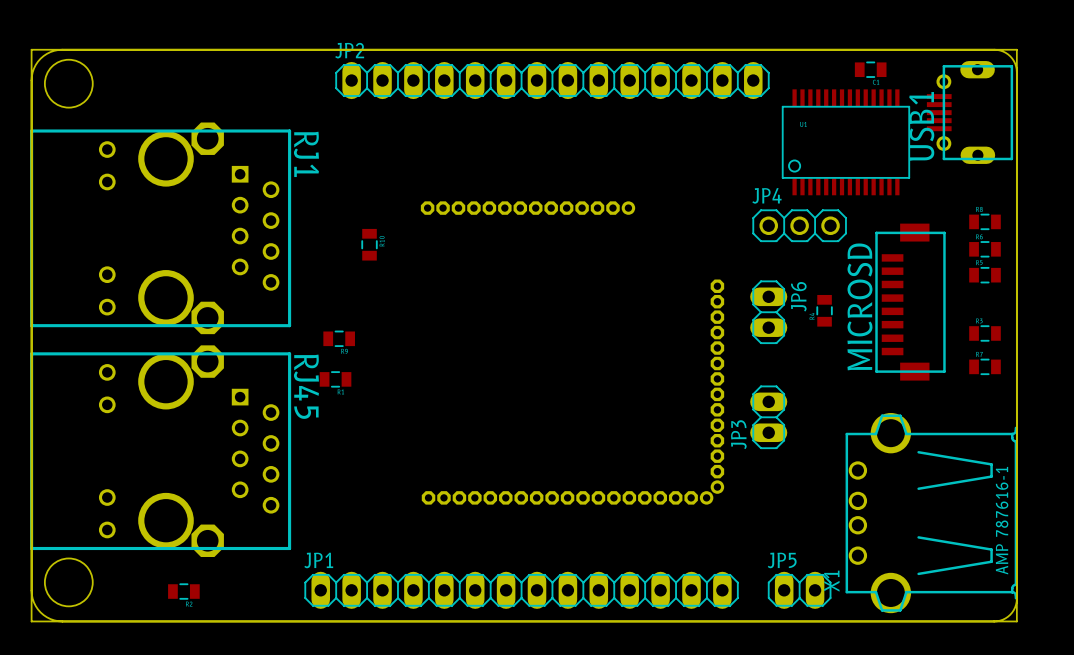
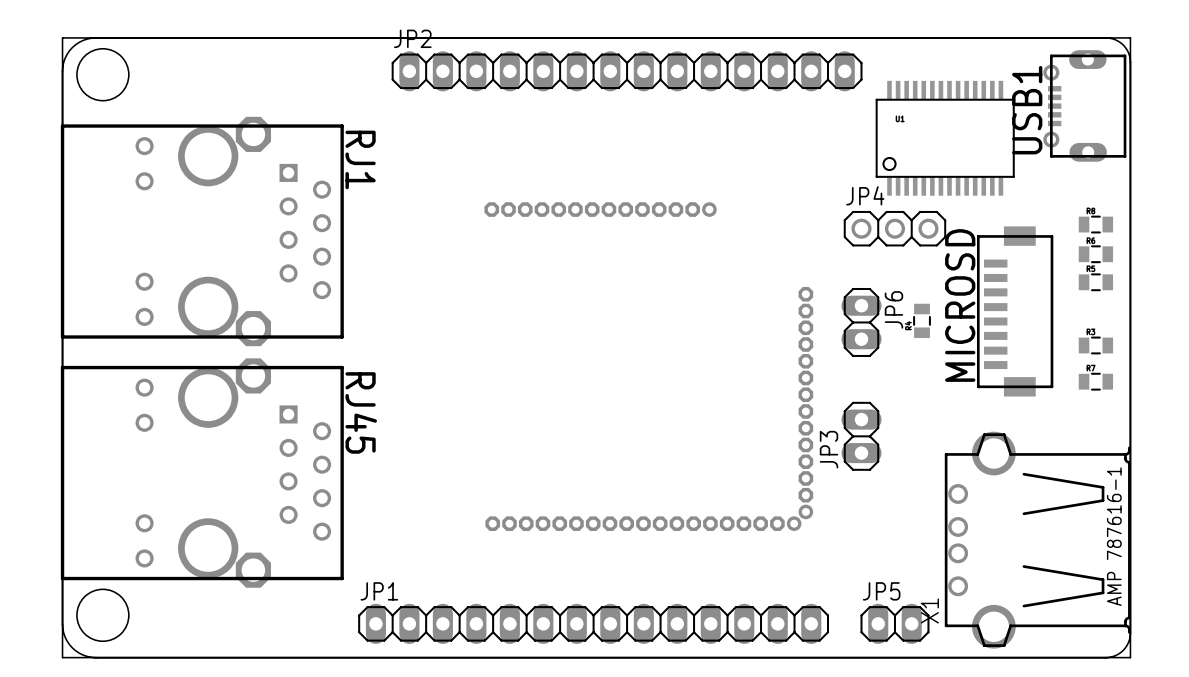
USB1 footprint: [926, 61, 1014, 164] -> [1043, 50, 1127, 162]
part: (870, 69) -> none
part: (369, 244) -> none
part: (339, 338) -> none
part: (335, 379) -> none
part: (183, 591) -> none

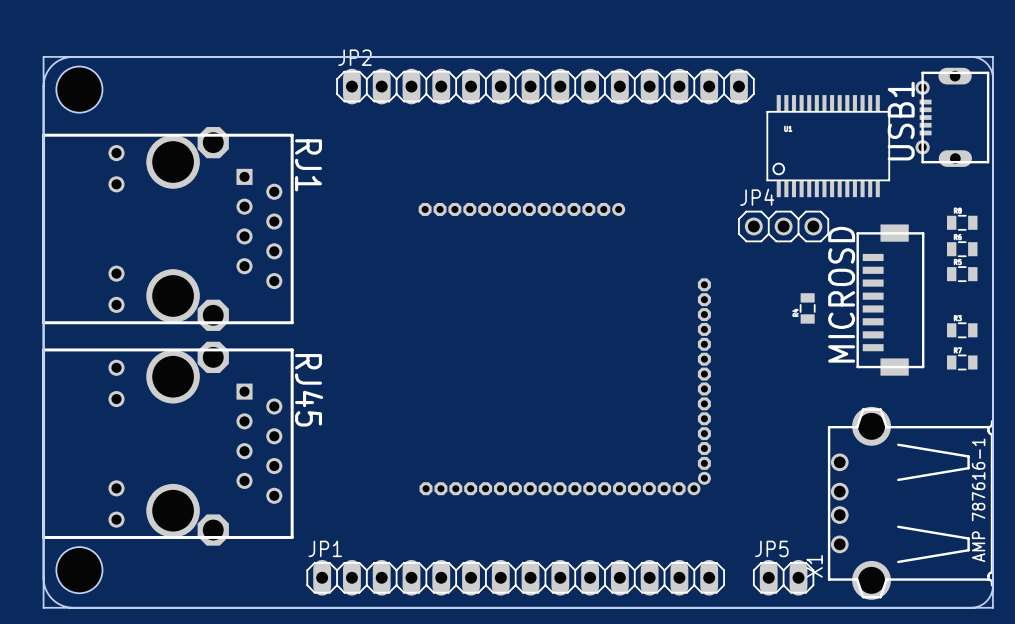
JP6: (861, 322) -> none
JP3: (861, 436) -> none

